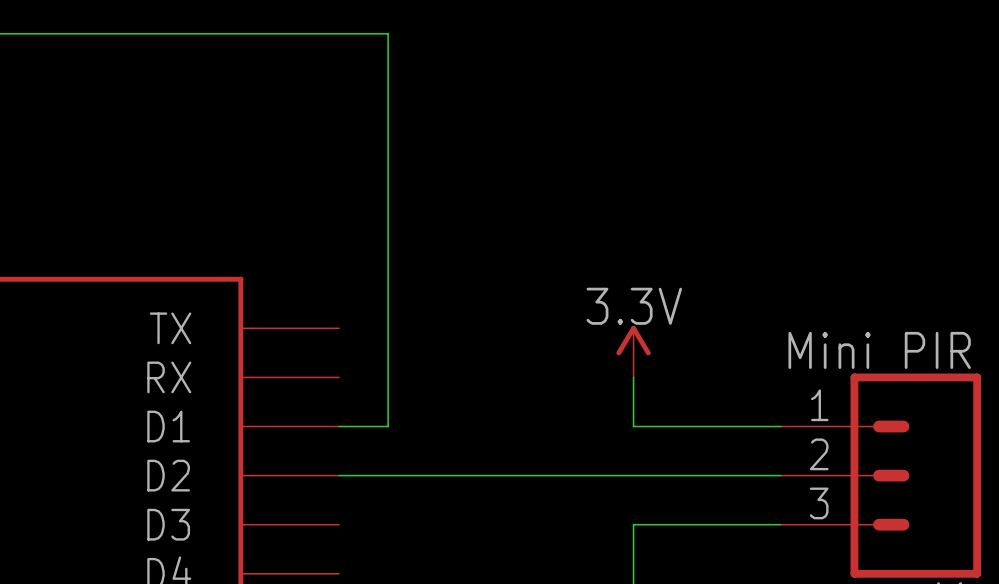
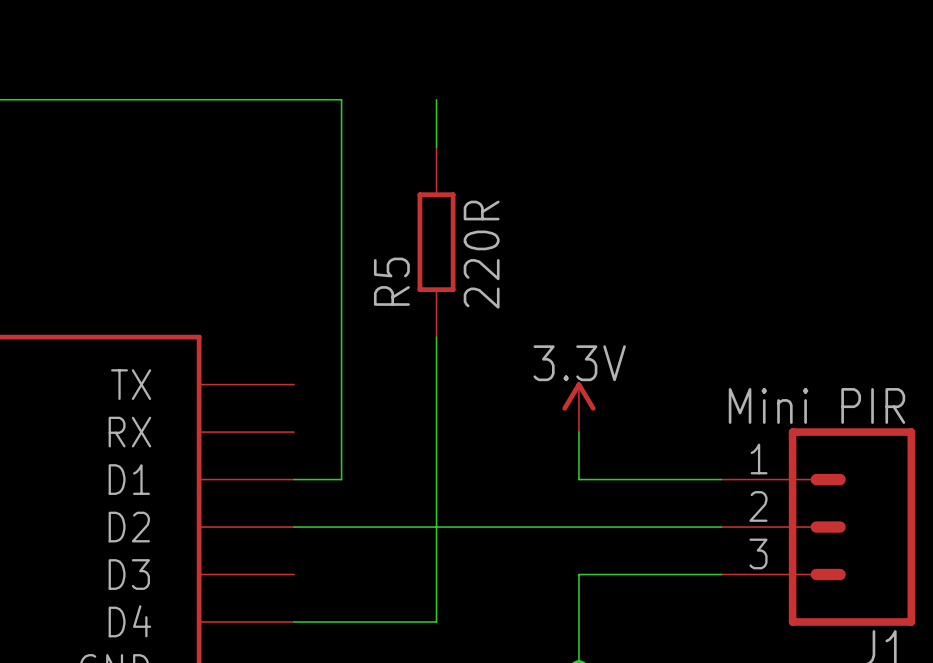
wire: none -> (436, 99) (436, 147)
R5: none -> 220R (436, 242)
wire: none -> (436, 337) (436, 621) (294, 621)

